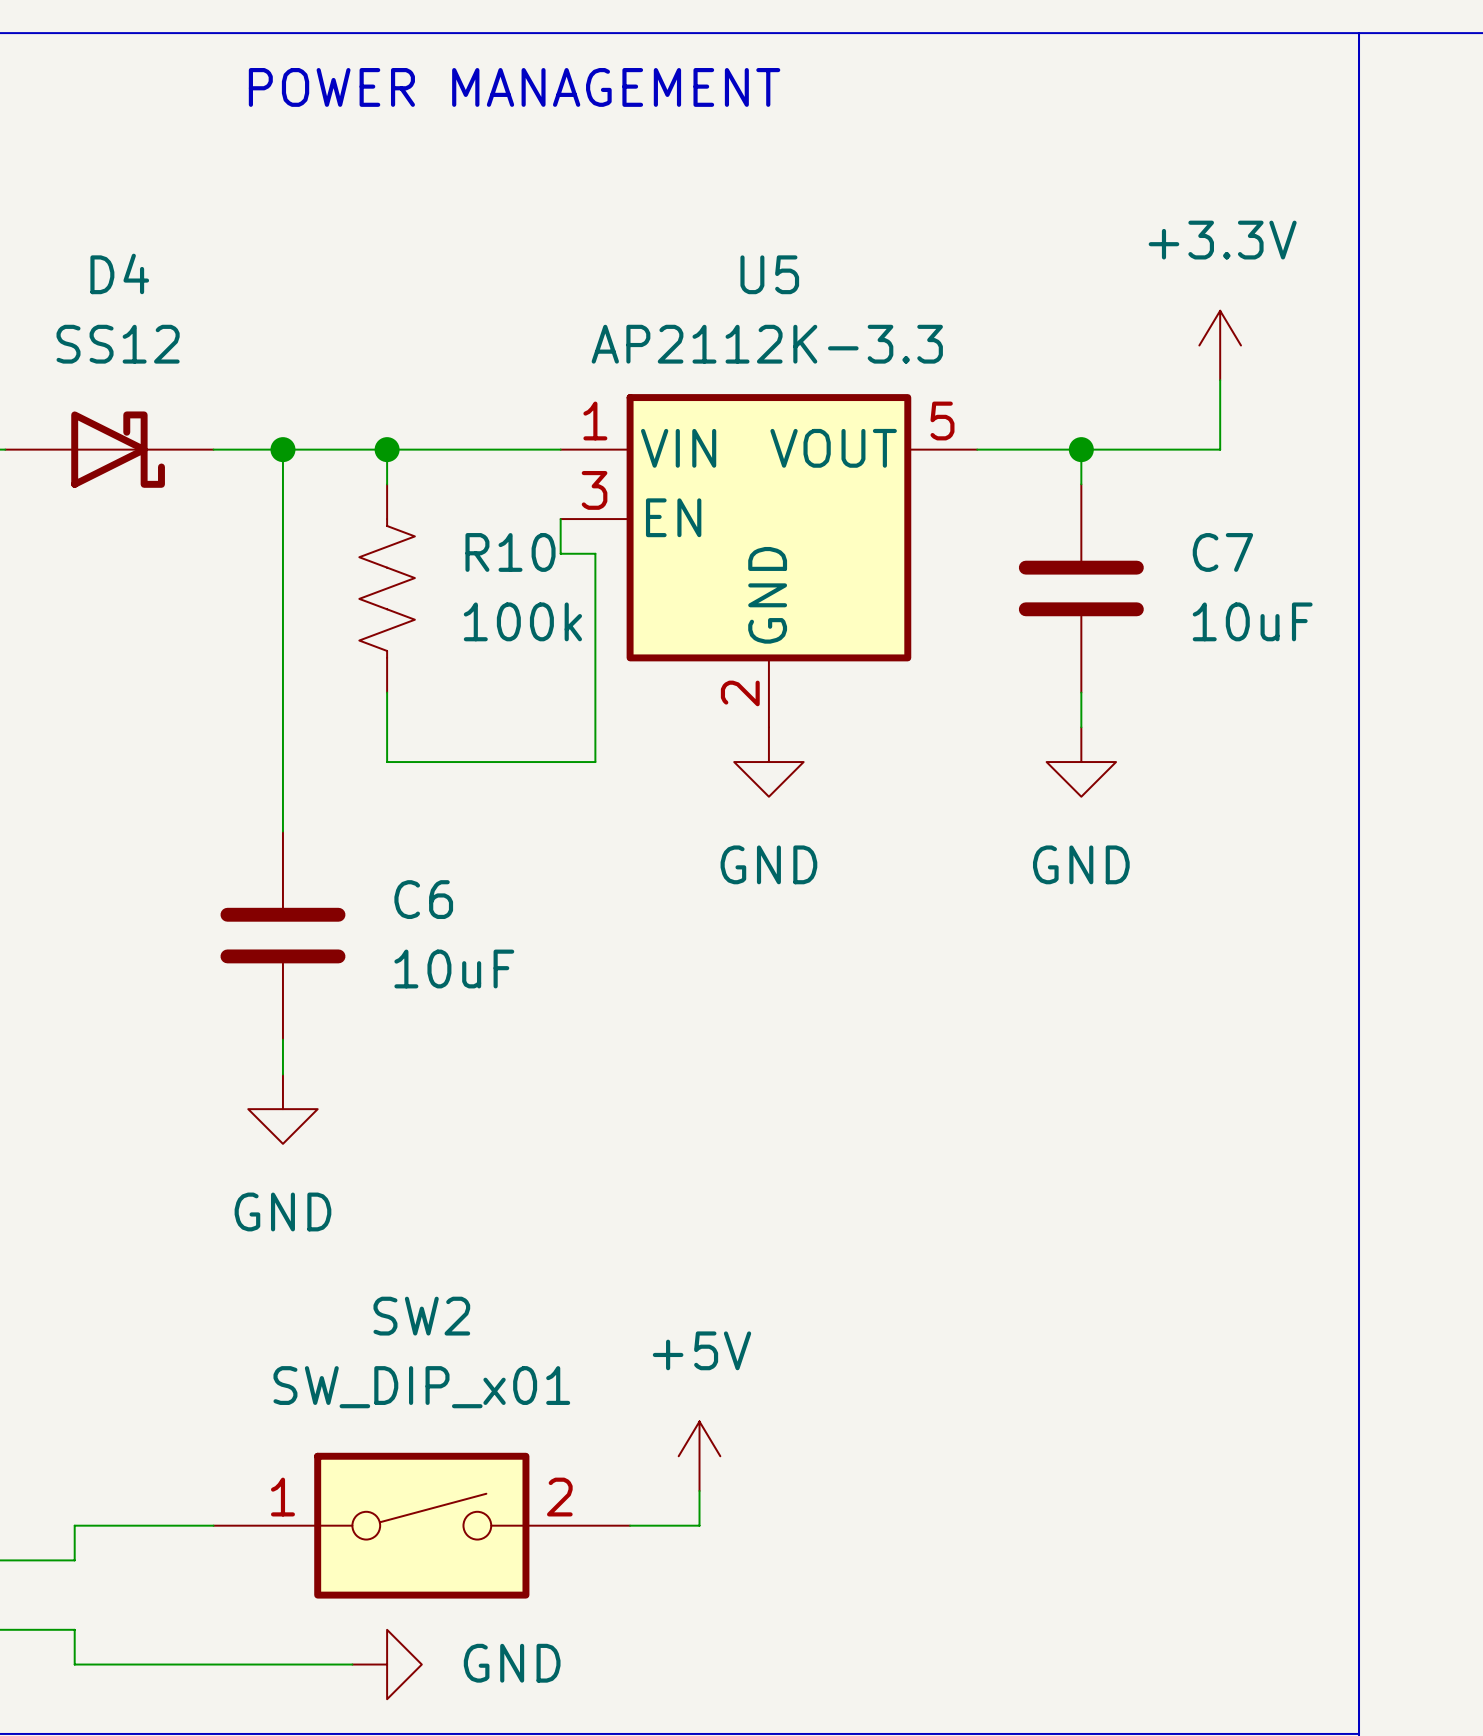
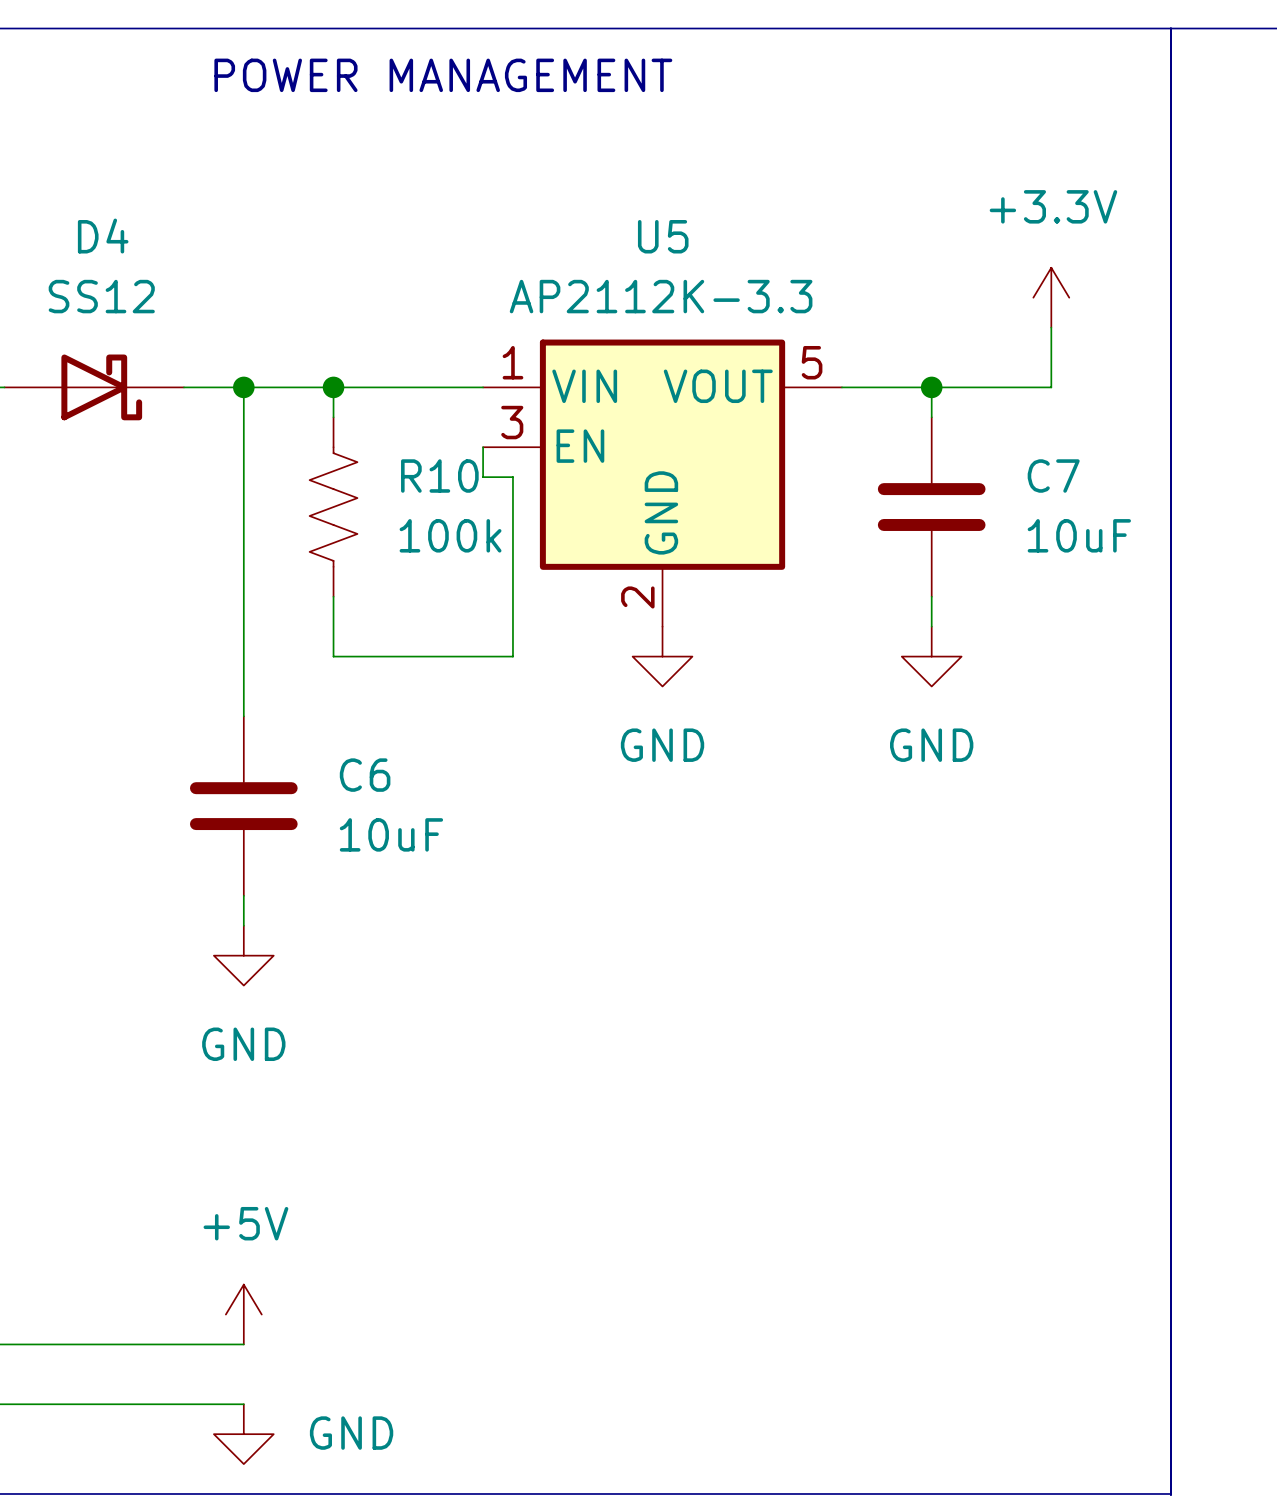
power symbol position: +5V (699, 1456) -> +5V (243, 1314)
wire: (699, 1490) (699, 1525) (630, 1525) -> none
wire: (213, 1525) (74, 1525) (74, 1560) -> (243, 1344) (64, 1344)
SW2: SW_DIP_x01 (421, 1525) -> none
wire: (74, 1629) (74, 1664) (352, 1664) -> (64, 1404) (243, 1404)
power symbol rotation: 0° (387, 1664) -> 90° clockwise (243, 1434)
power symbol position: GND (387, 1664) -> GND (243, 1434)

